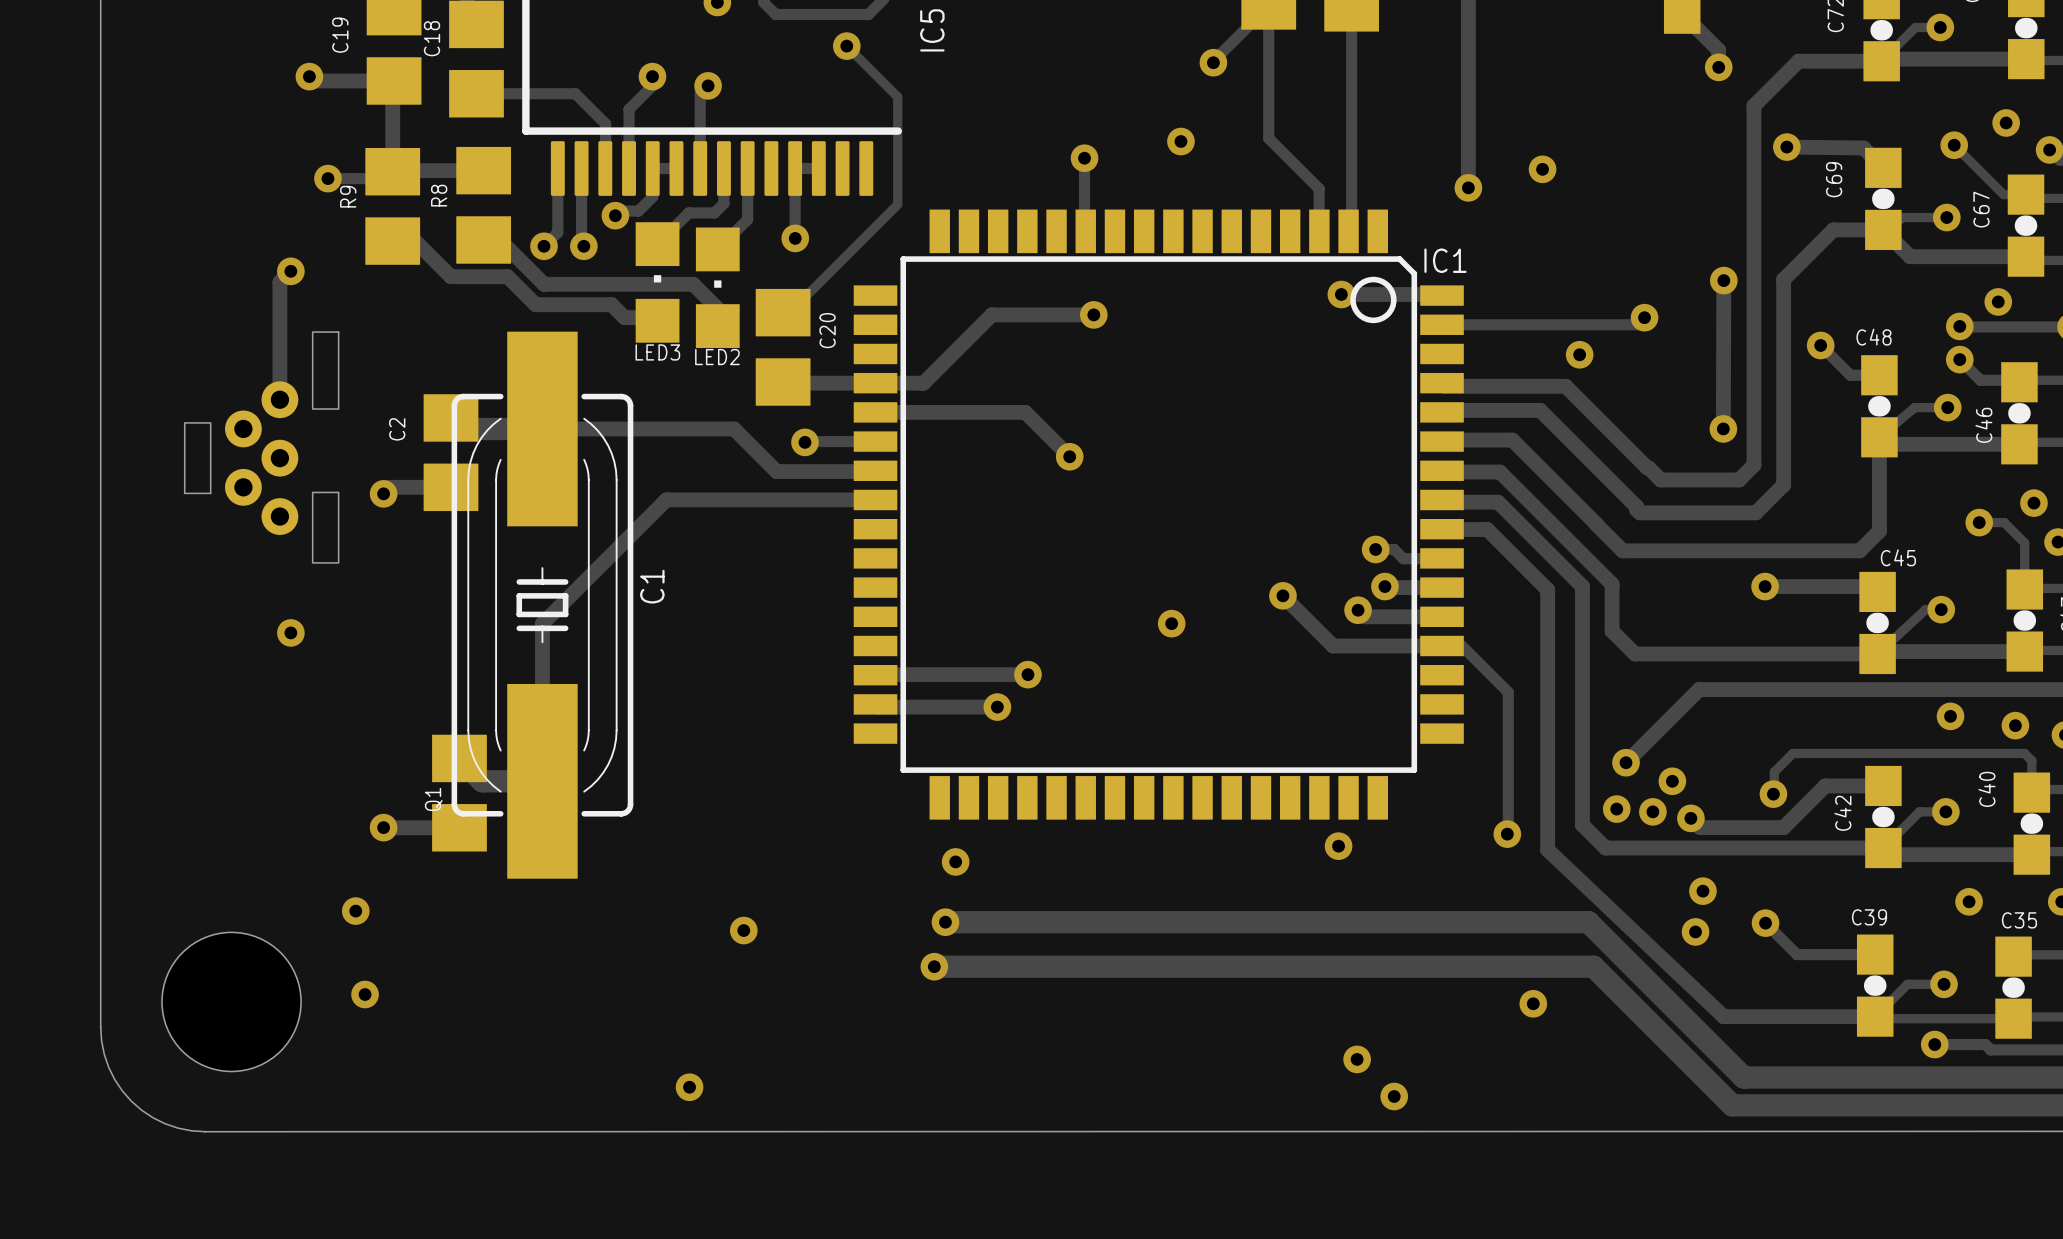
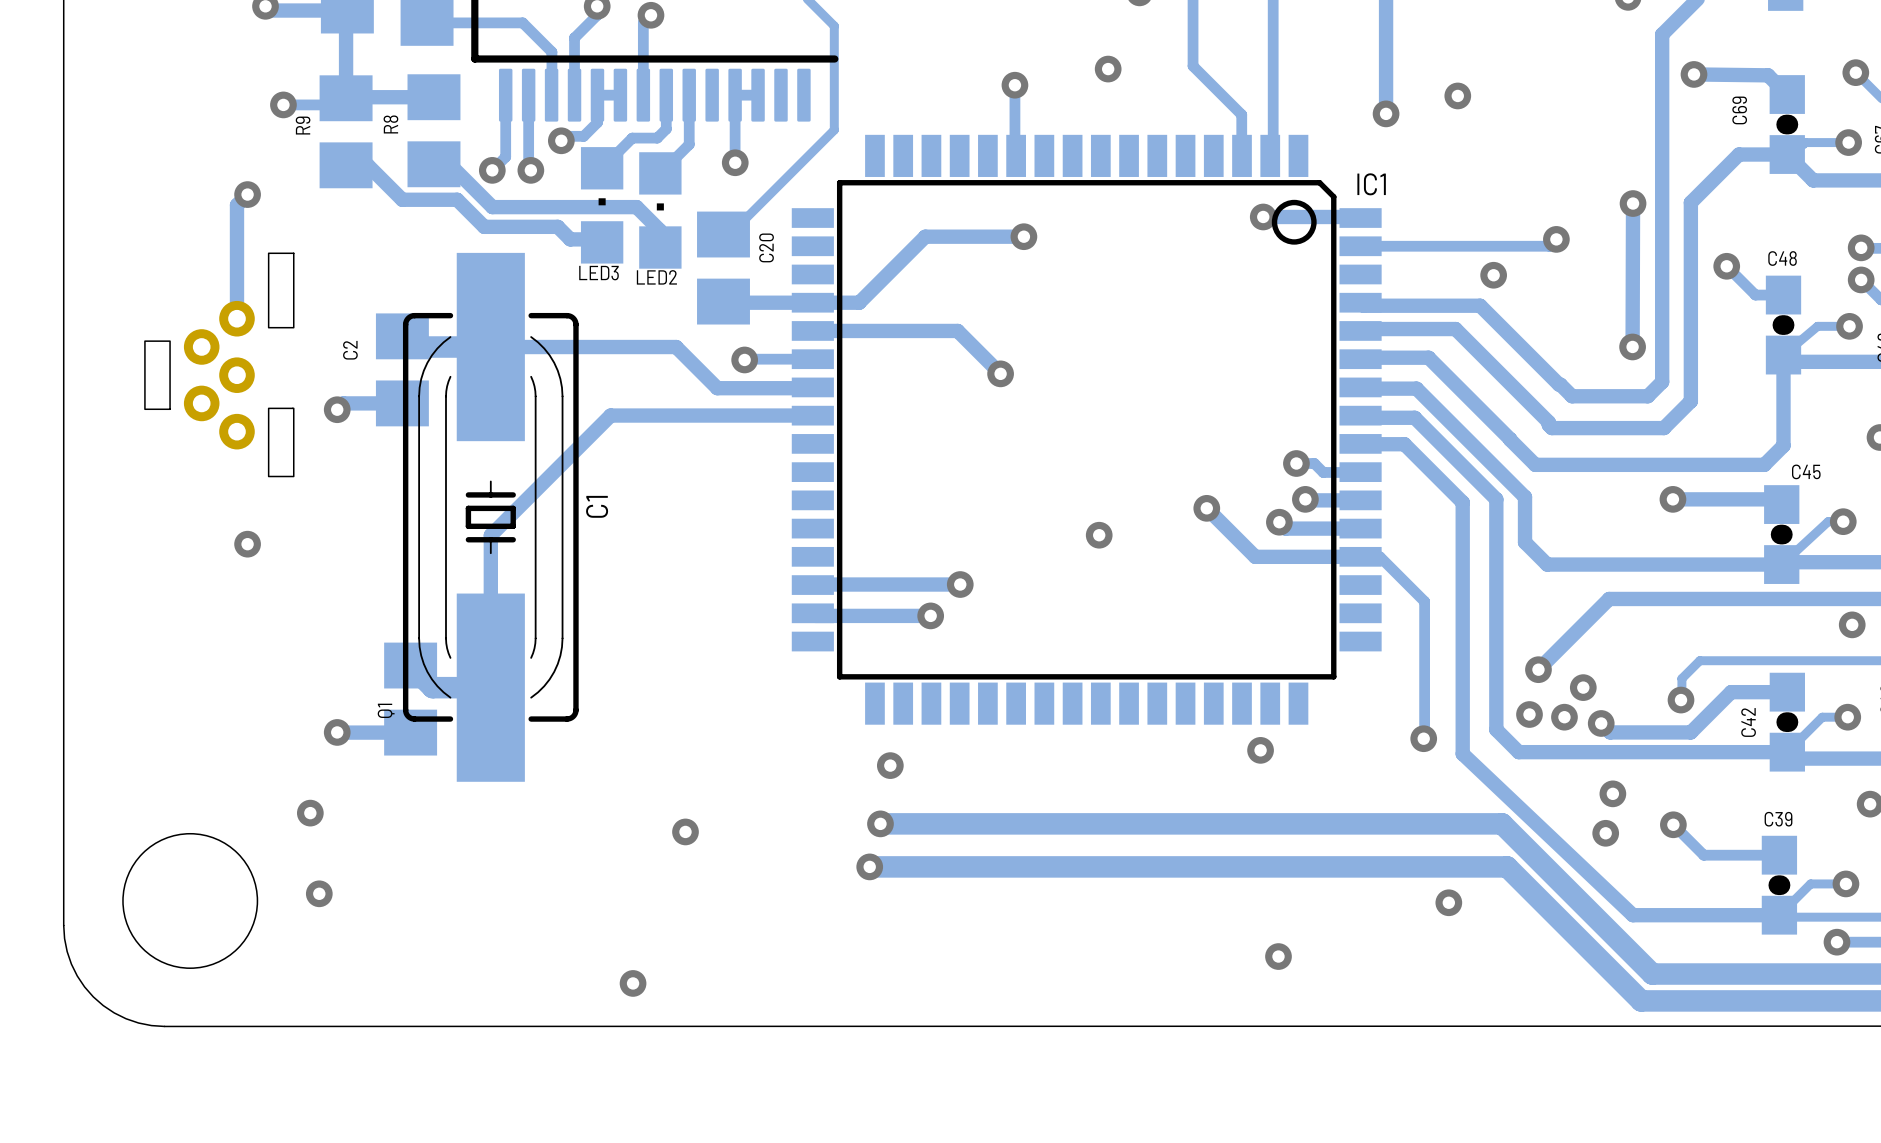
via: (1394, 1096) -> none

